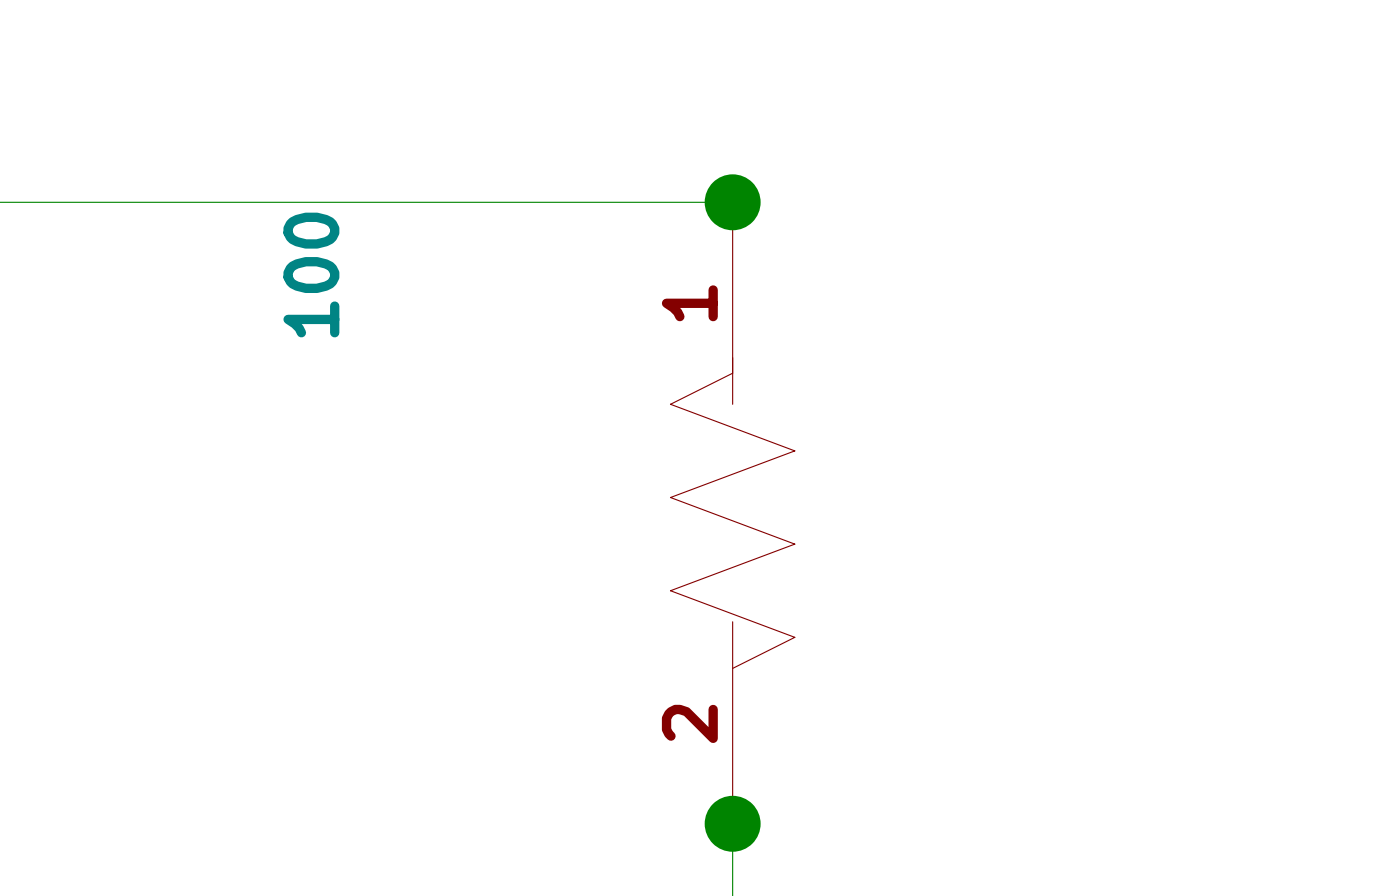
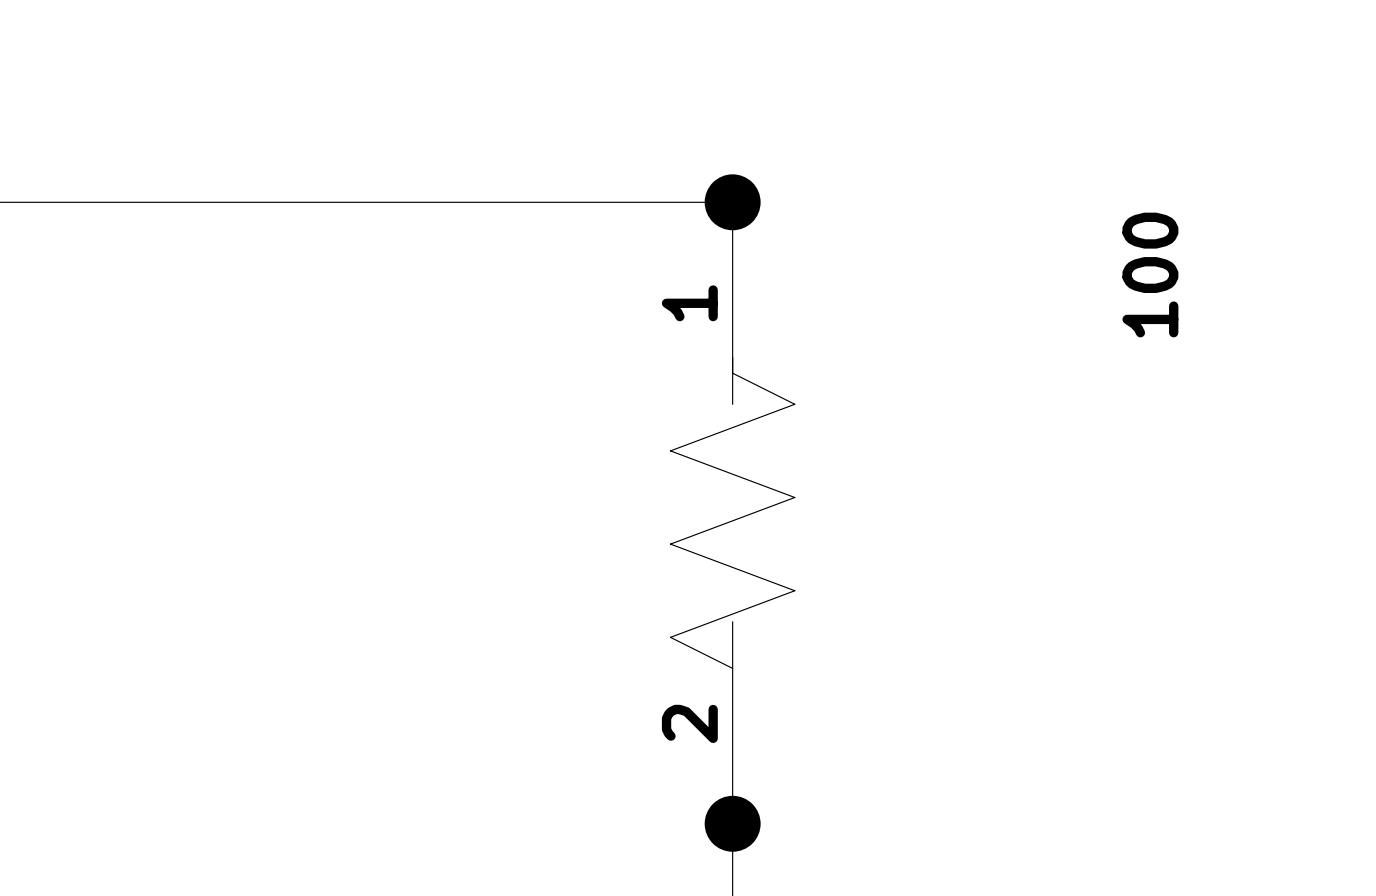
part flip: as is (732, 513) -> left-right (732, 513)

